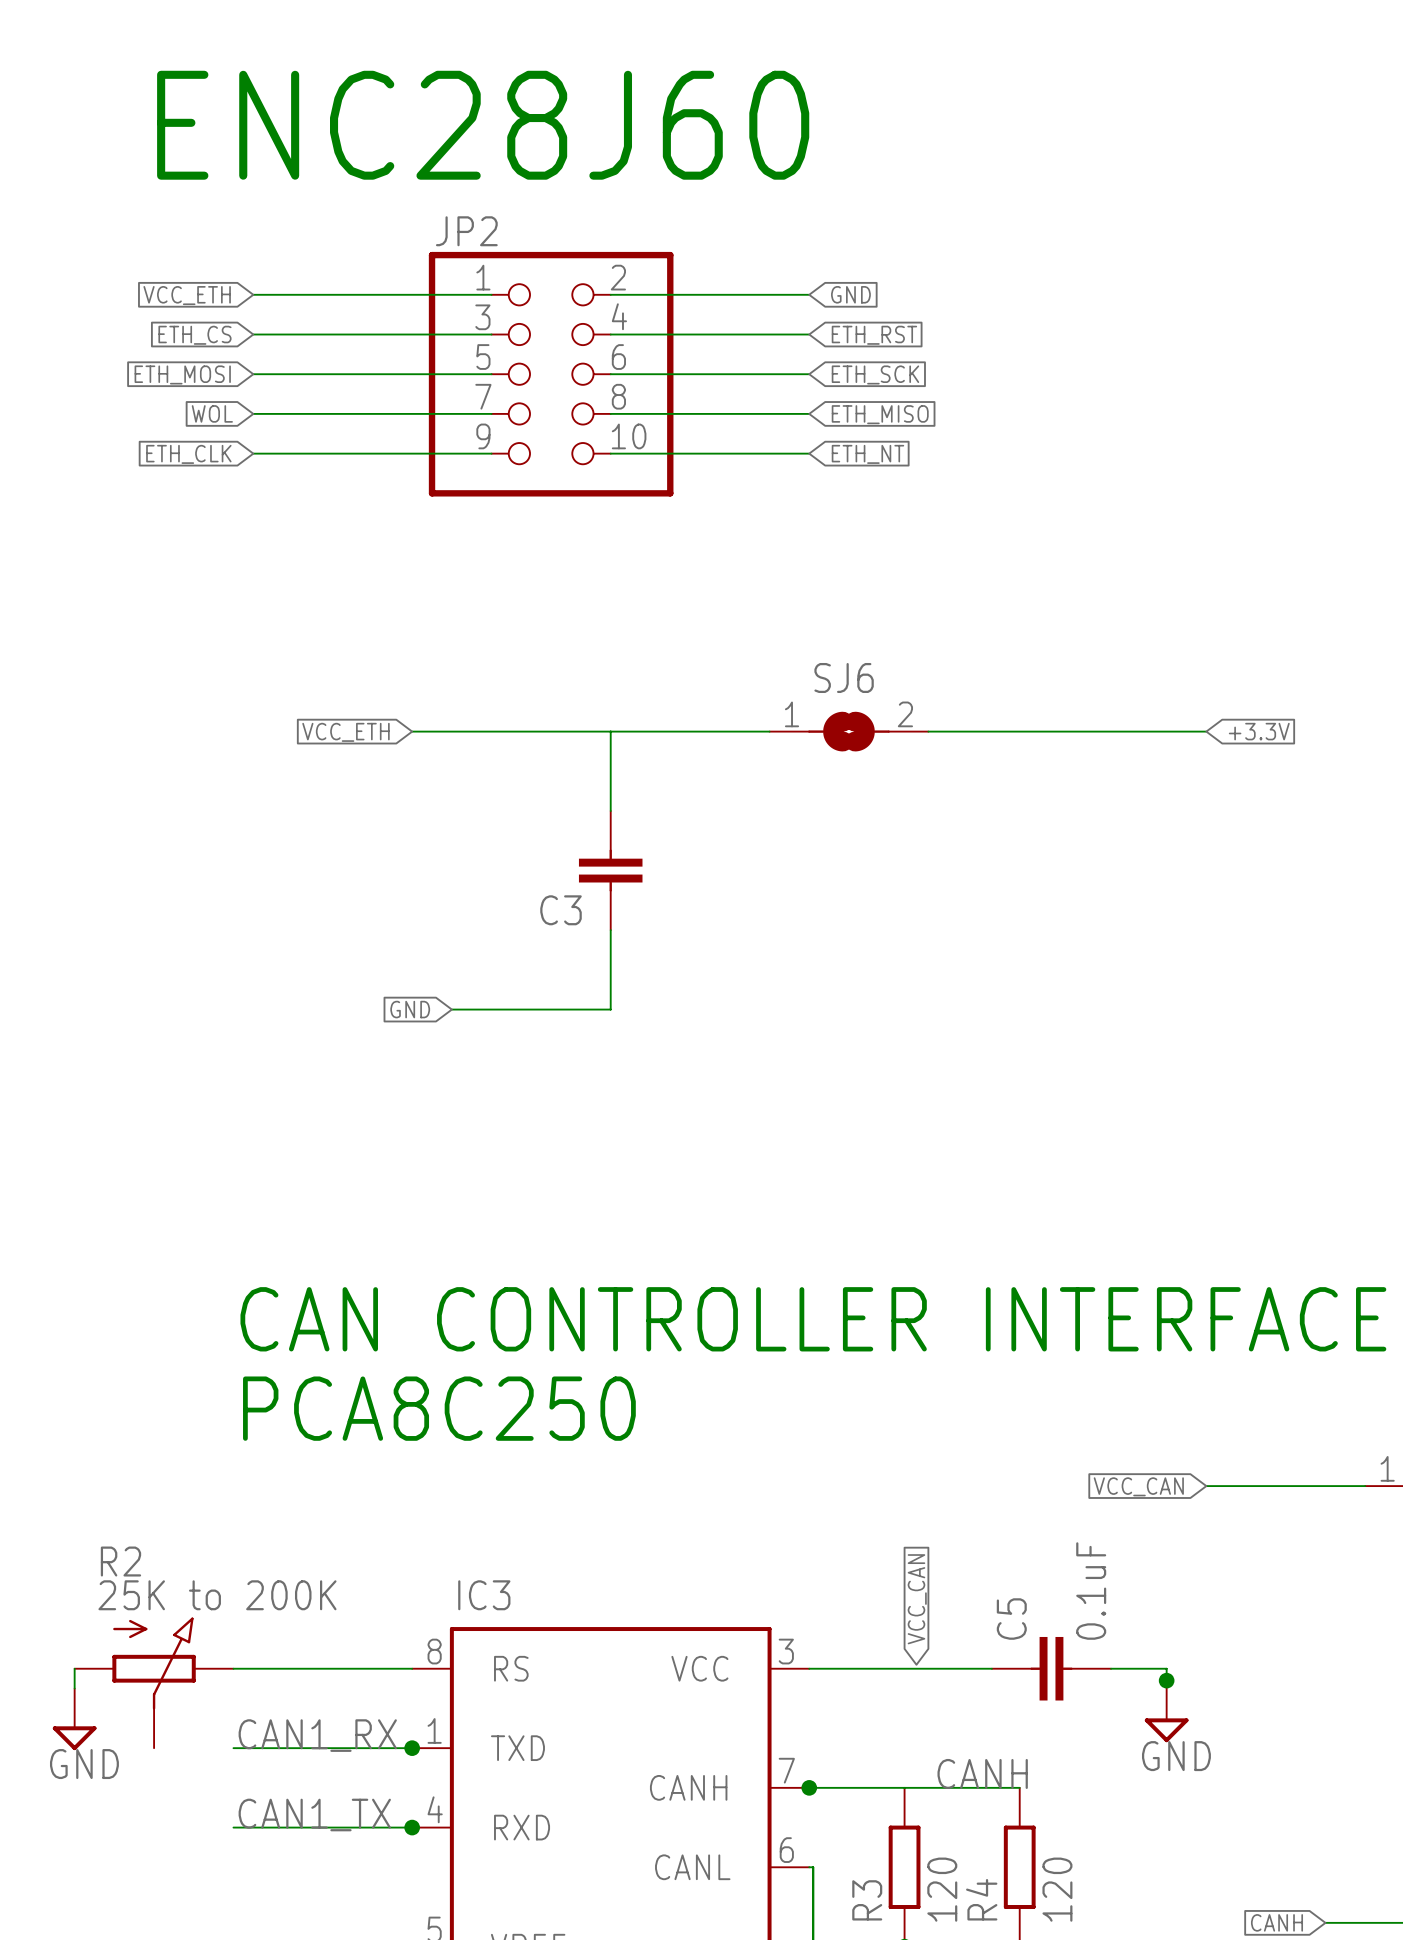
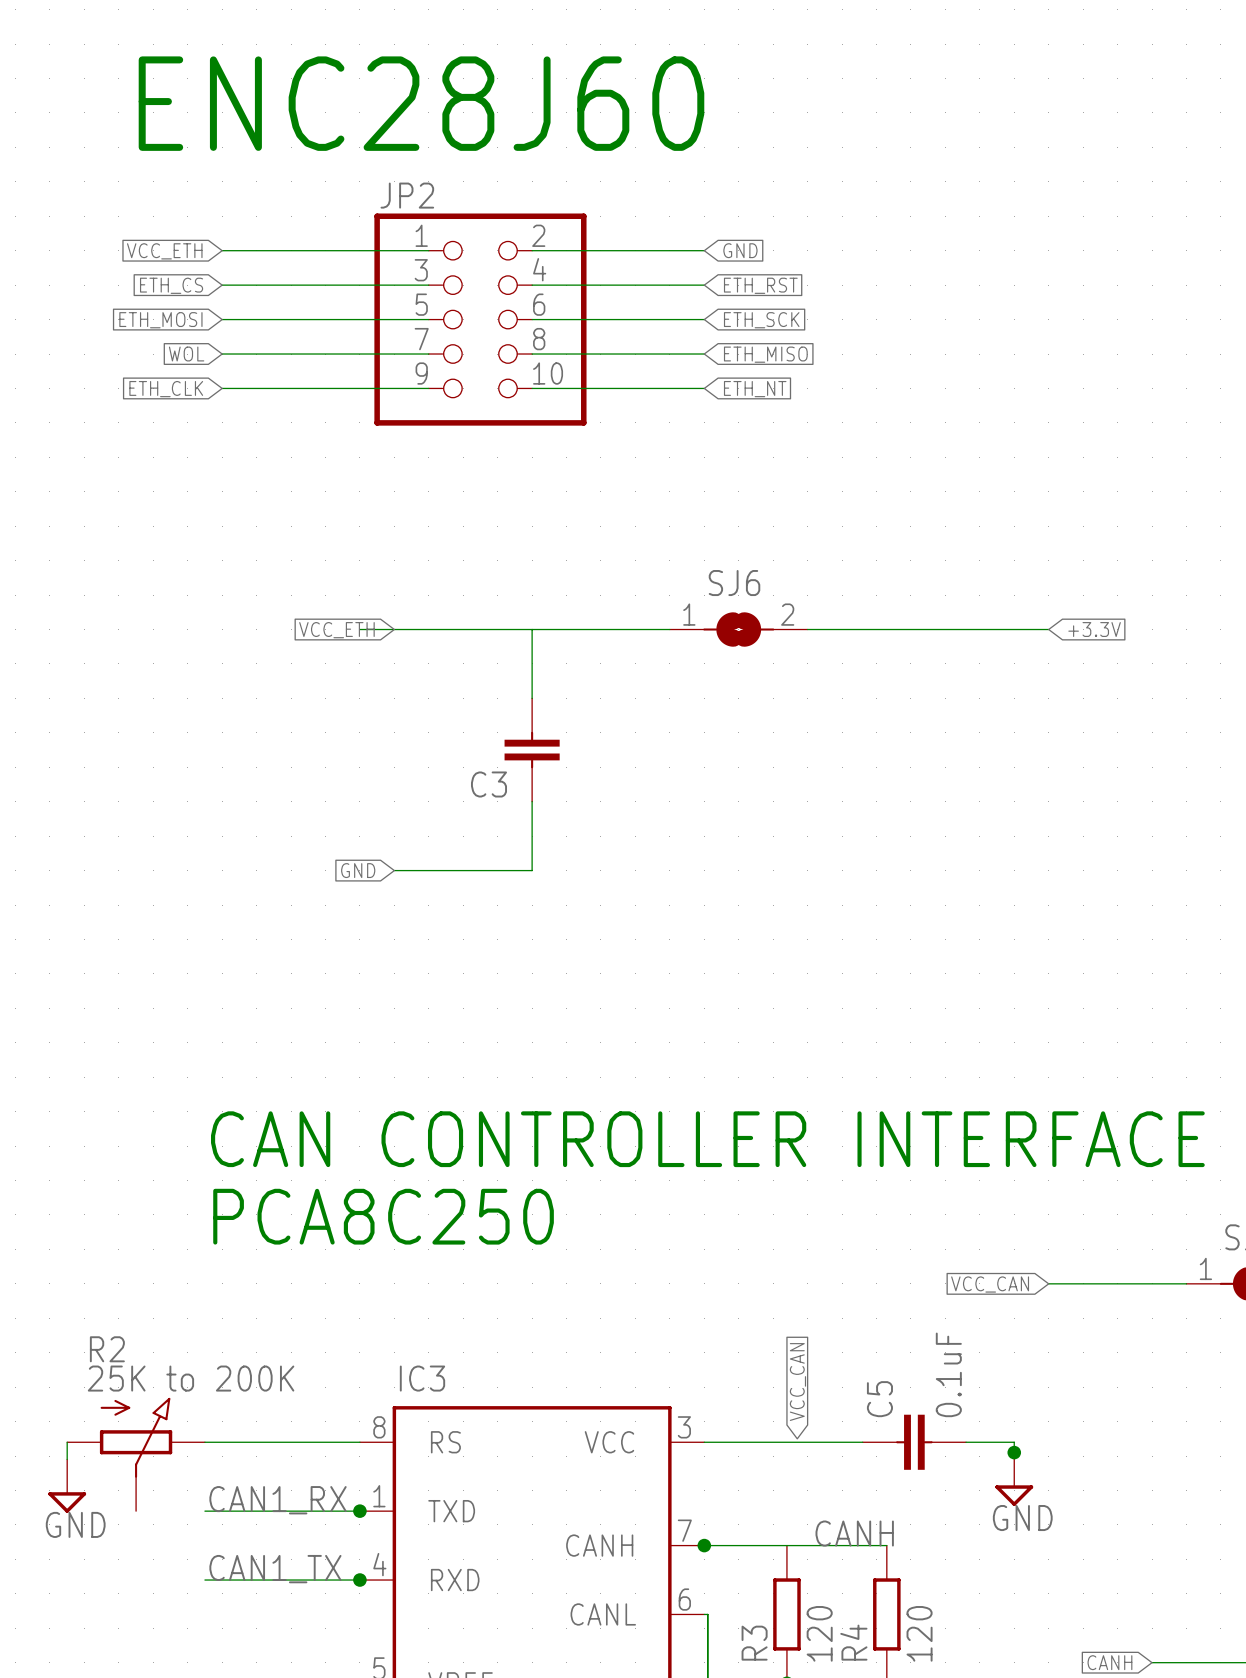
global label position: VCC_ETH (345, 732) -> VCC_ETH (336, 630)

